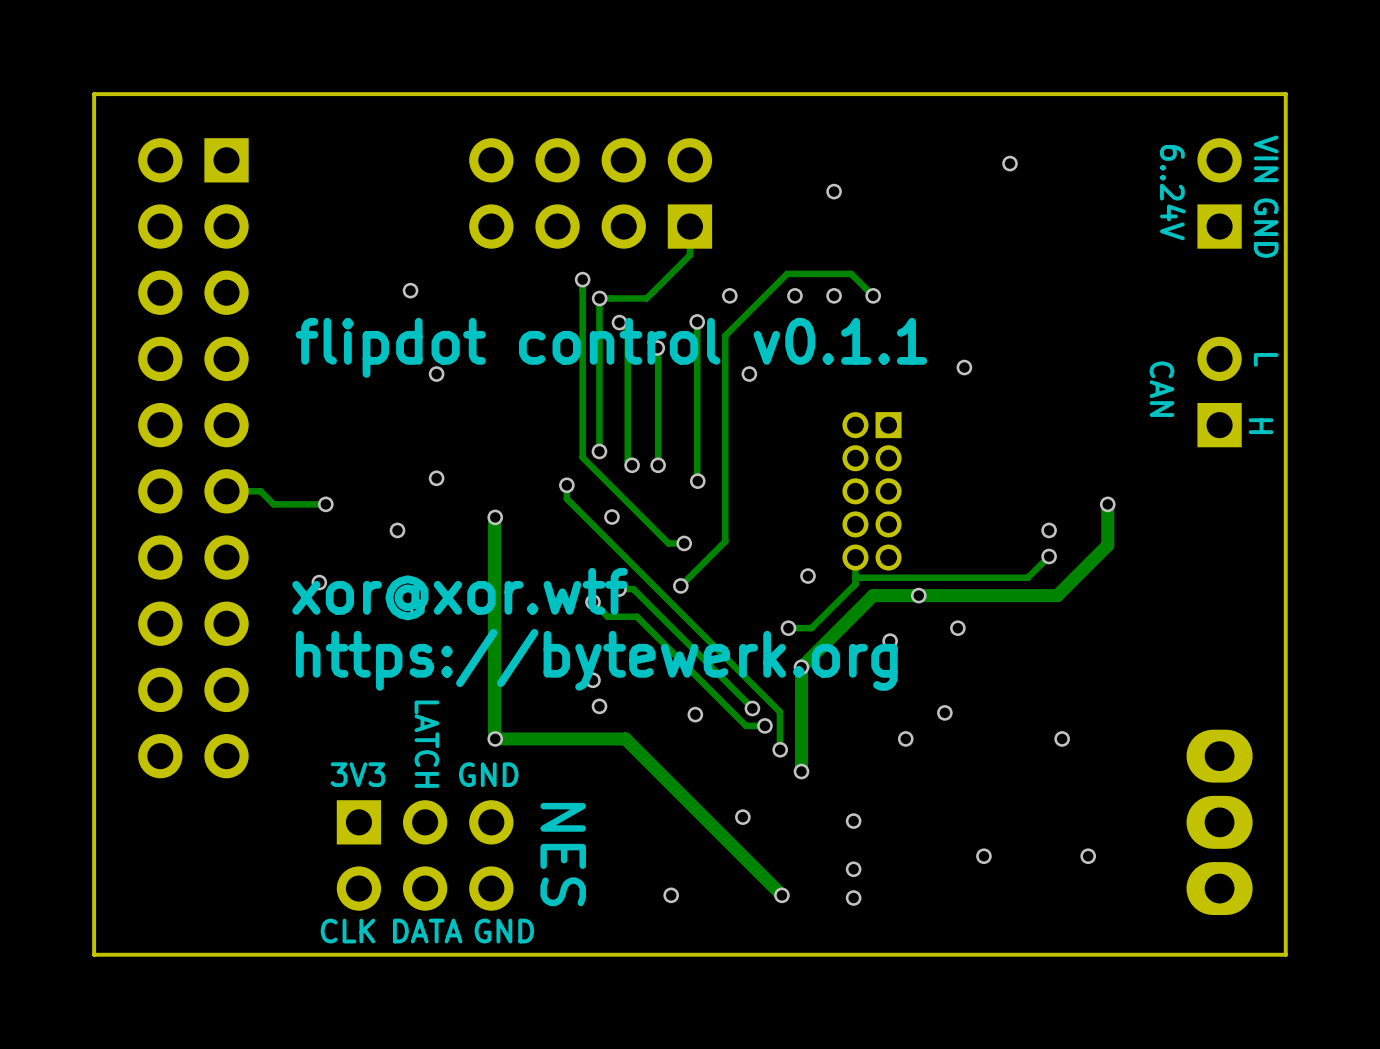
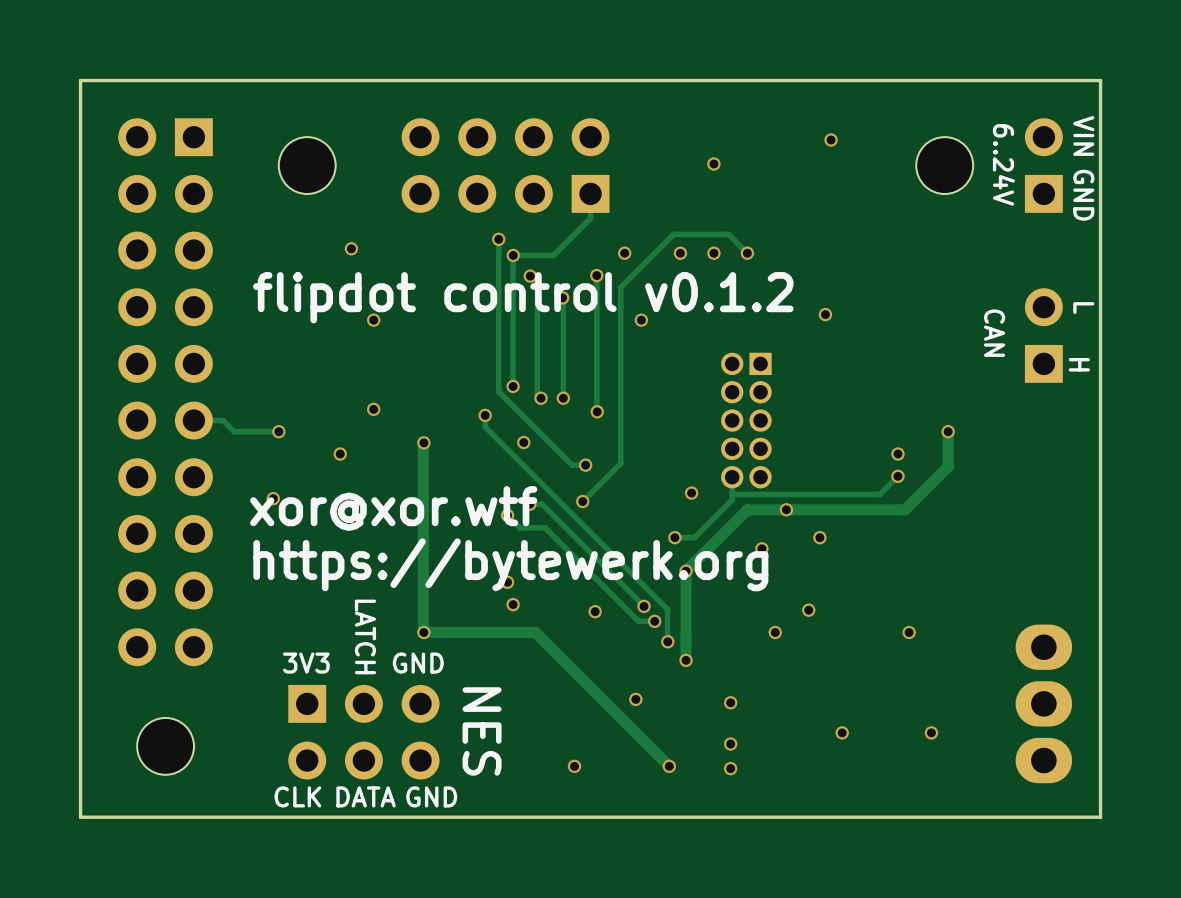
via position: (1010, 163) -> (831, 140)
part: none -> (307, 165)
part: none -> (944, 165)
text: flipdot control v0.1.1 (611, 347) -> flipdot control v0.1.2 (523, 297)
part: none -> (165, 746)

